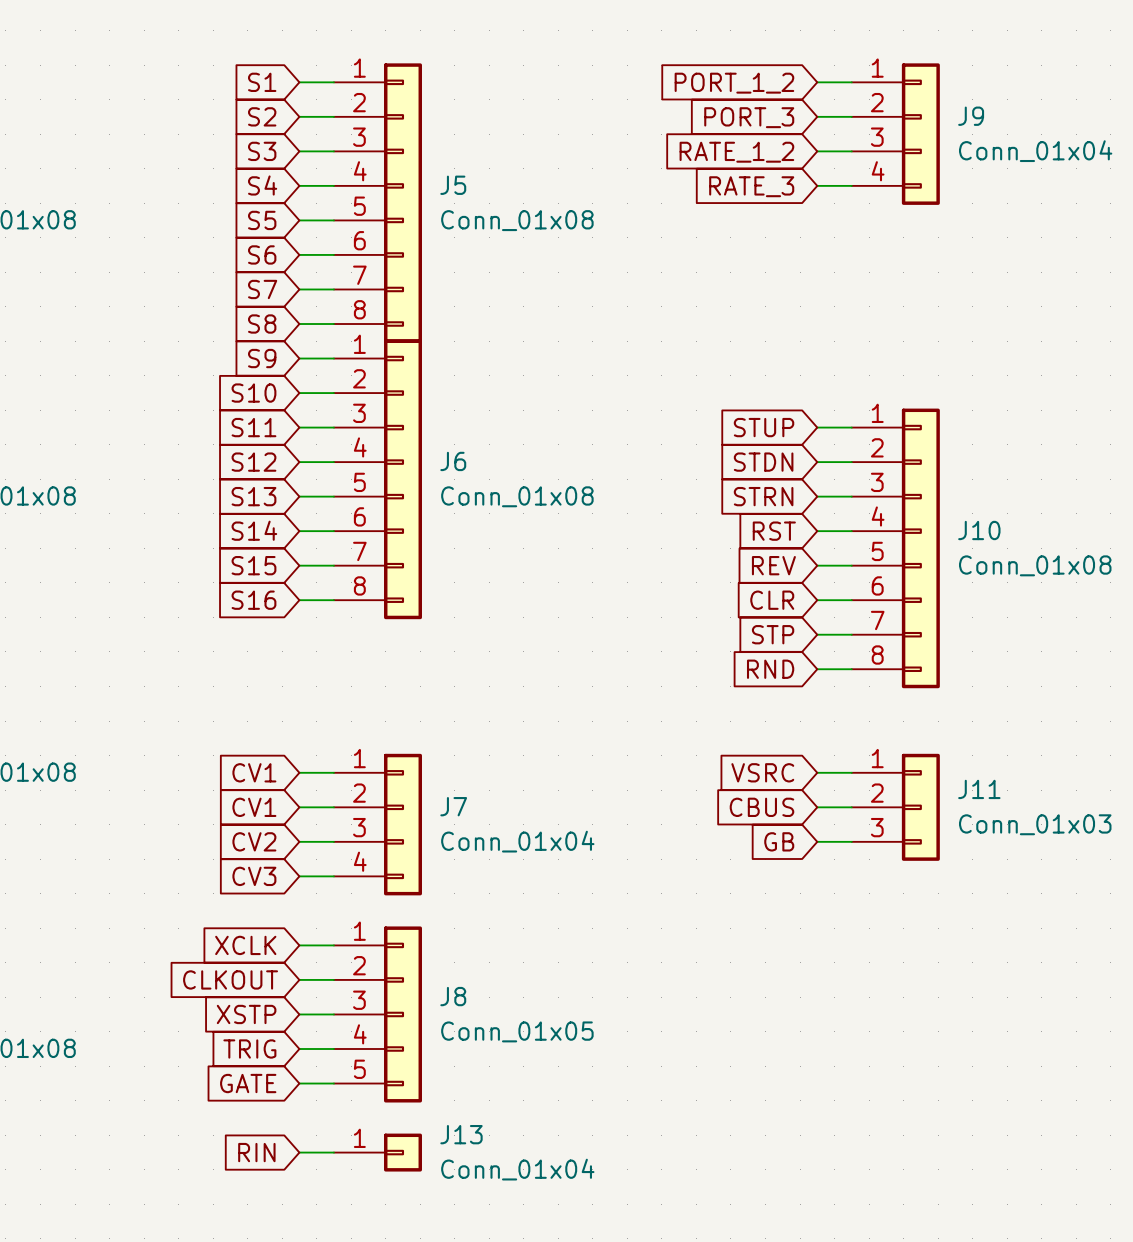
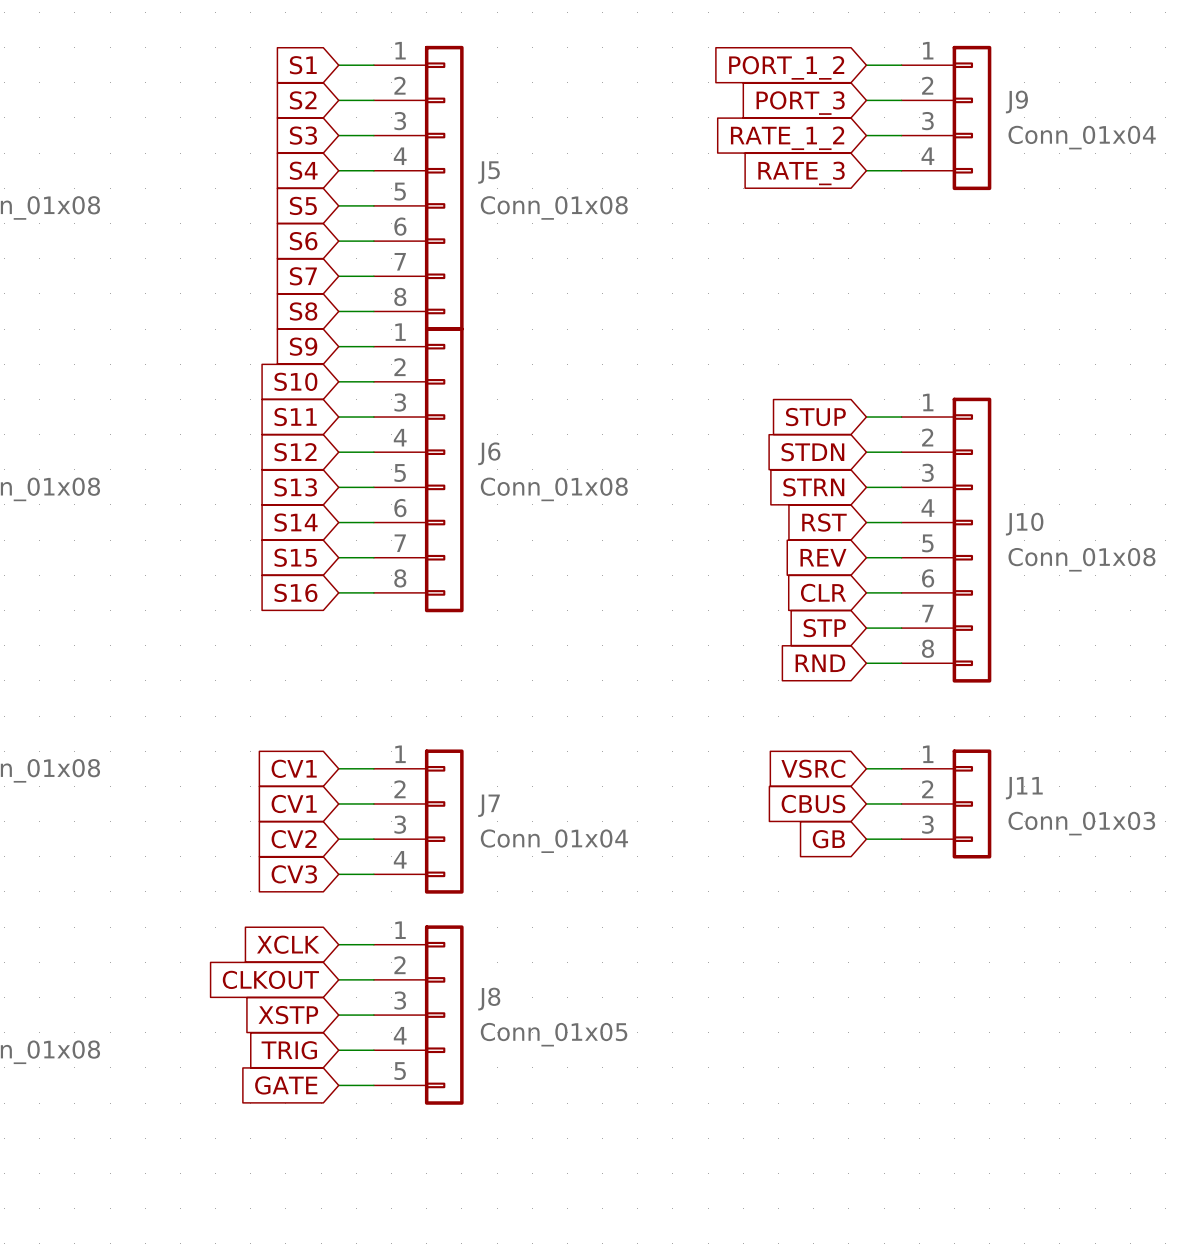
global label: RIN (256, 1152) -> none
wire: (299, 1152) (333, 1152) -> none
J13: Conn_01x04 (377, 1152) -> none

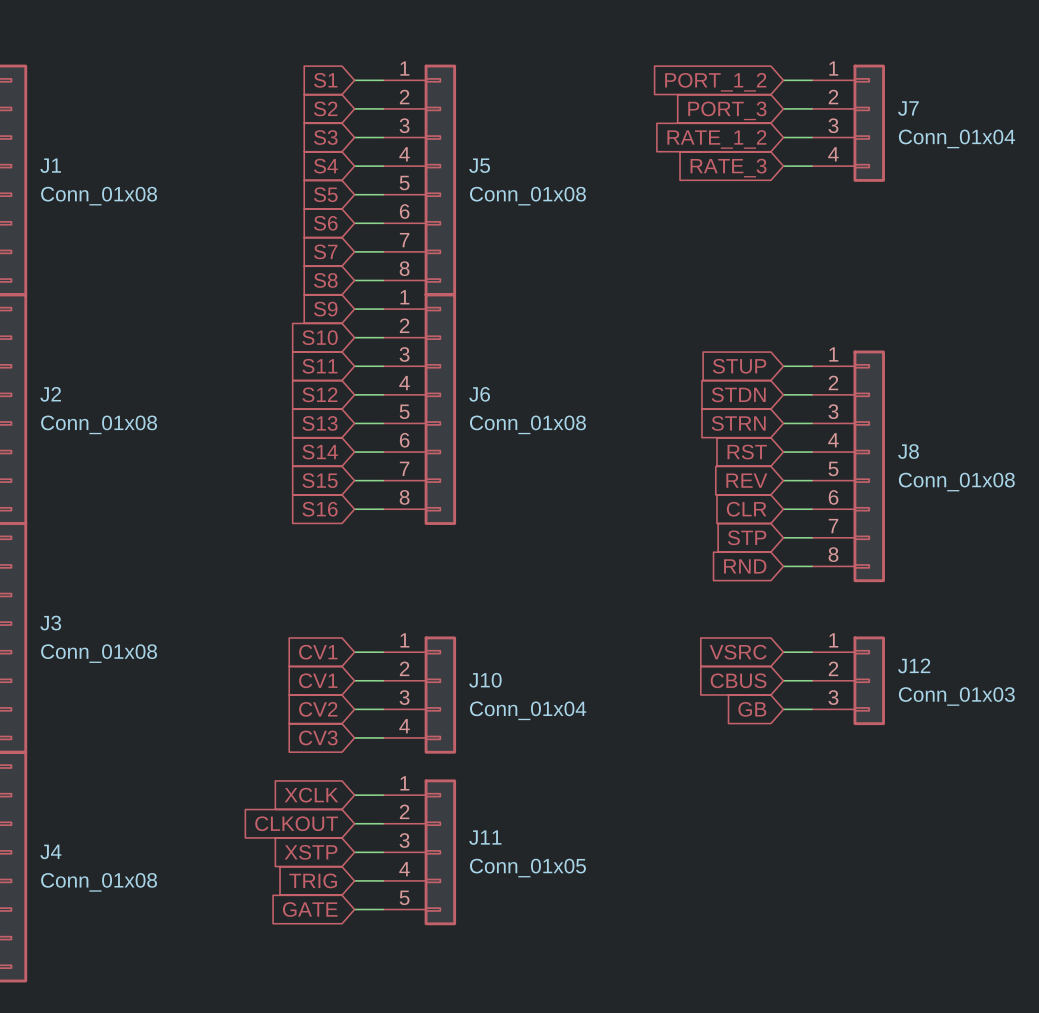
J9 name: J9 (1016, 101) -> J7 (908, 108)
J10 name: J10 (1024, 524) -> J8 (908, 451)
J11 name: J11 (1024, 788) -> J12 (914, 665)
J7 name: J7 (489, 805) -> J10 (485, 680)
J8 name: J8 (489, 999) -> J11 (485, 837)

